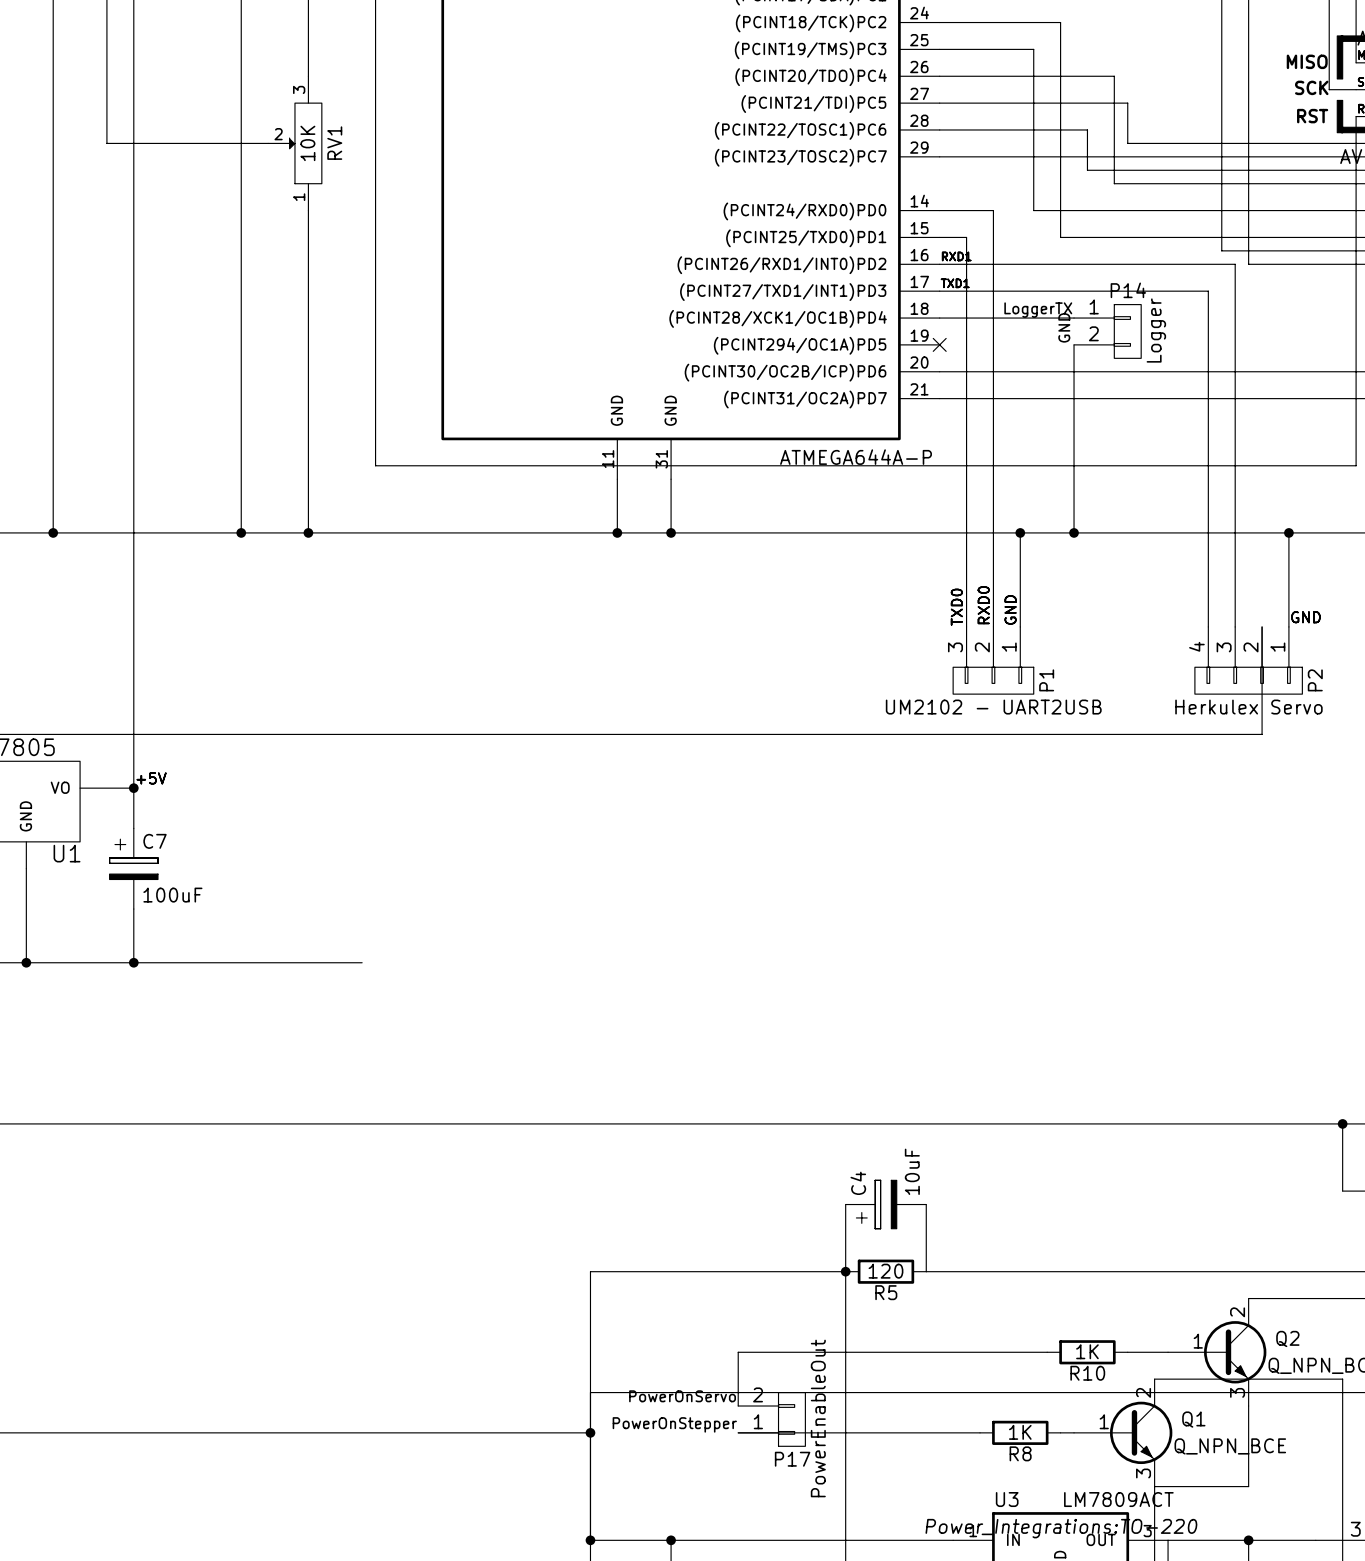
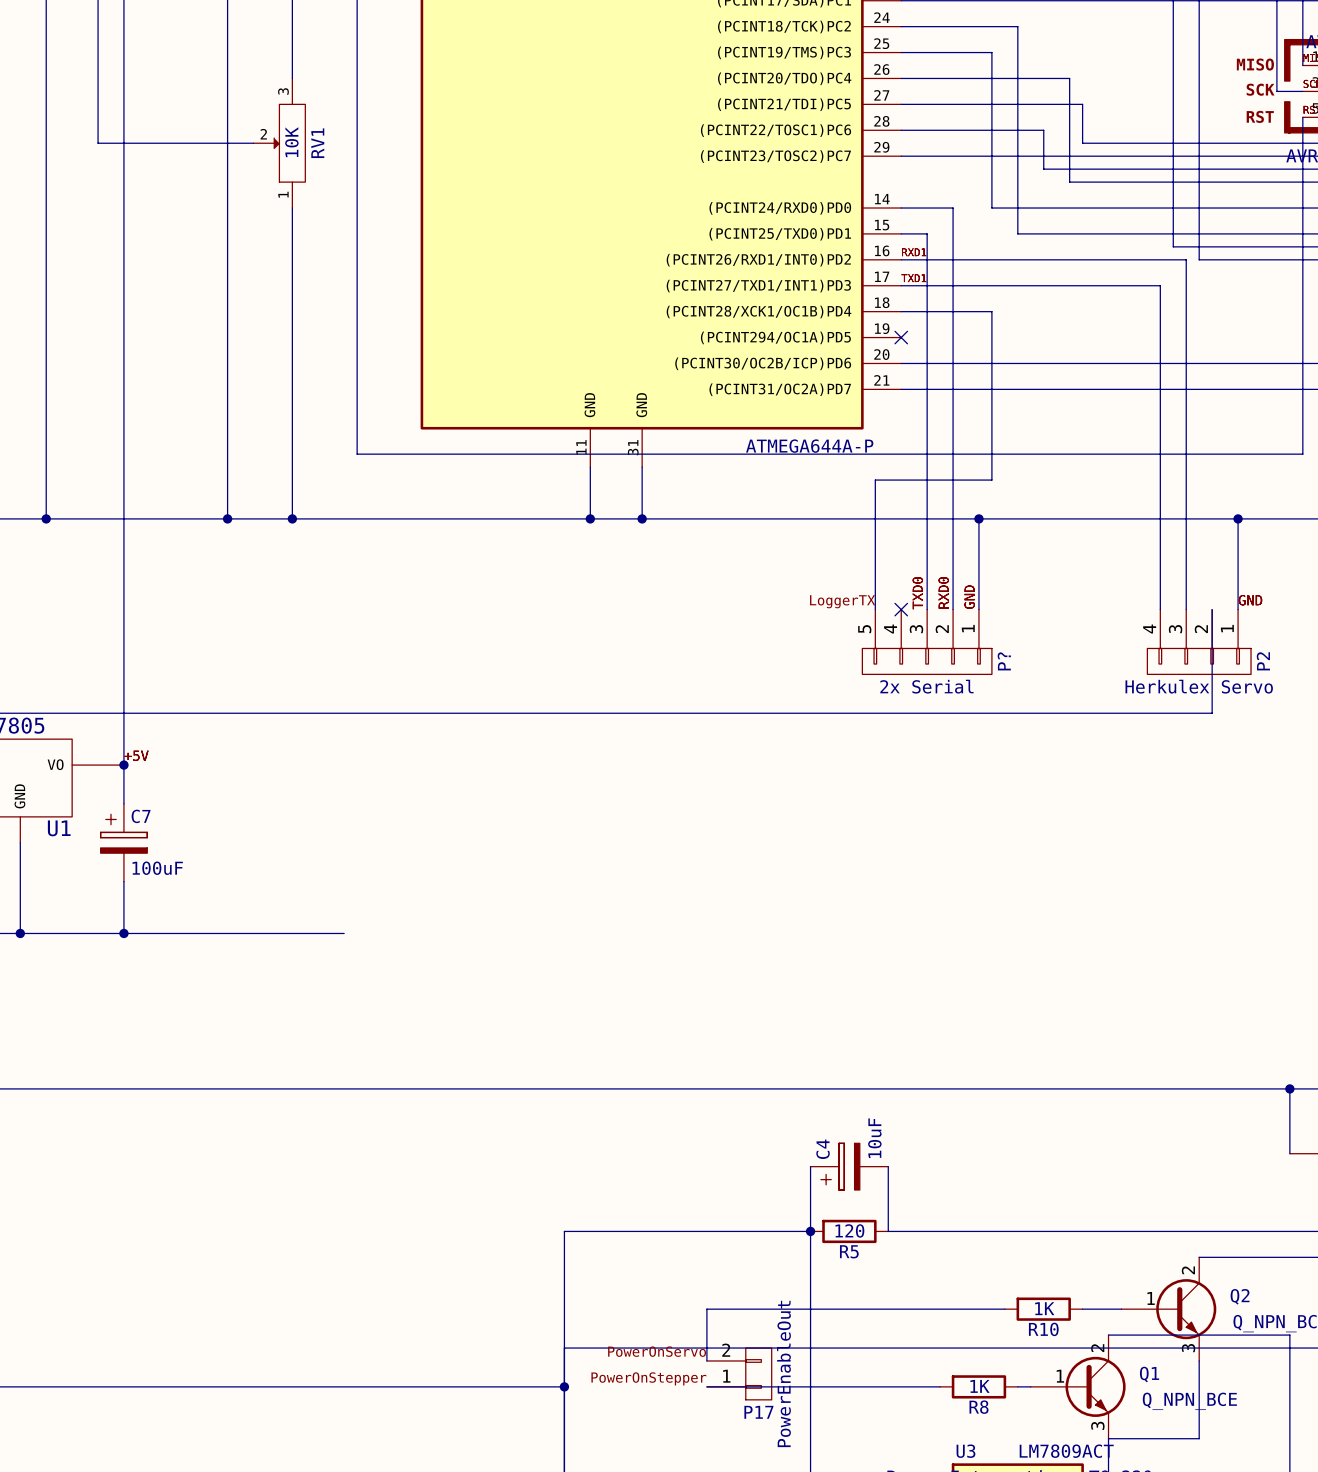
label: LoggerTX (1038, 310) -> none
wire: (1033, 318) (1074, 318) -> (991, 311) (991, 480) (875, 480) (875, 609)
label: GND (1064, 327) -> none
P14: Logger (1107, 331) -> none
wire: (1074, 344) (1074, 532) -> none
junction: (1074, 532) -> none
label: none -> LoggerTX (842, 601)
no-connect mark: none -> (901, 609)
P?: none -> 2x Serial (927, 641)
P1: UM2102 - UART2USB (993, 660) -> none

